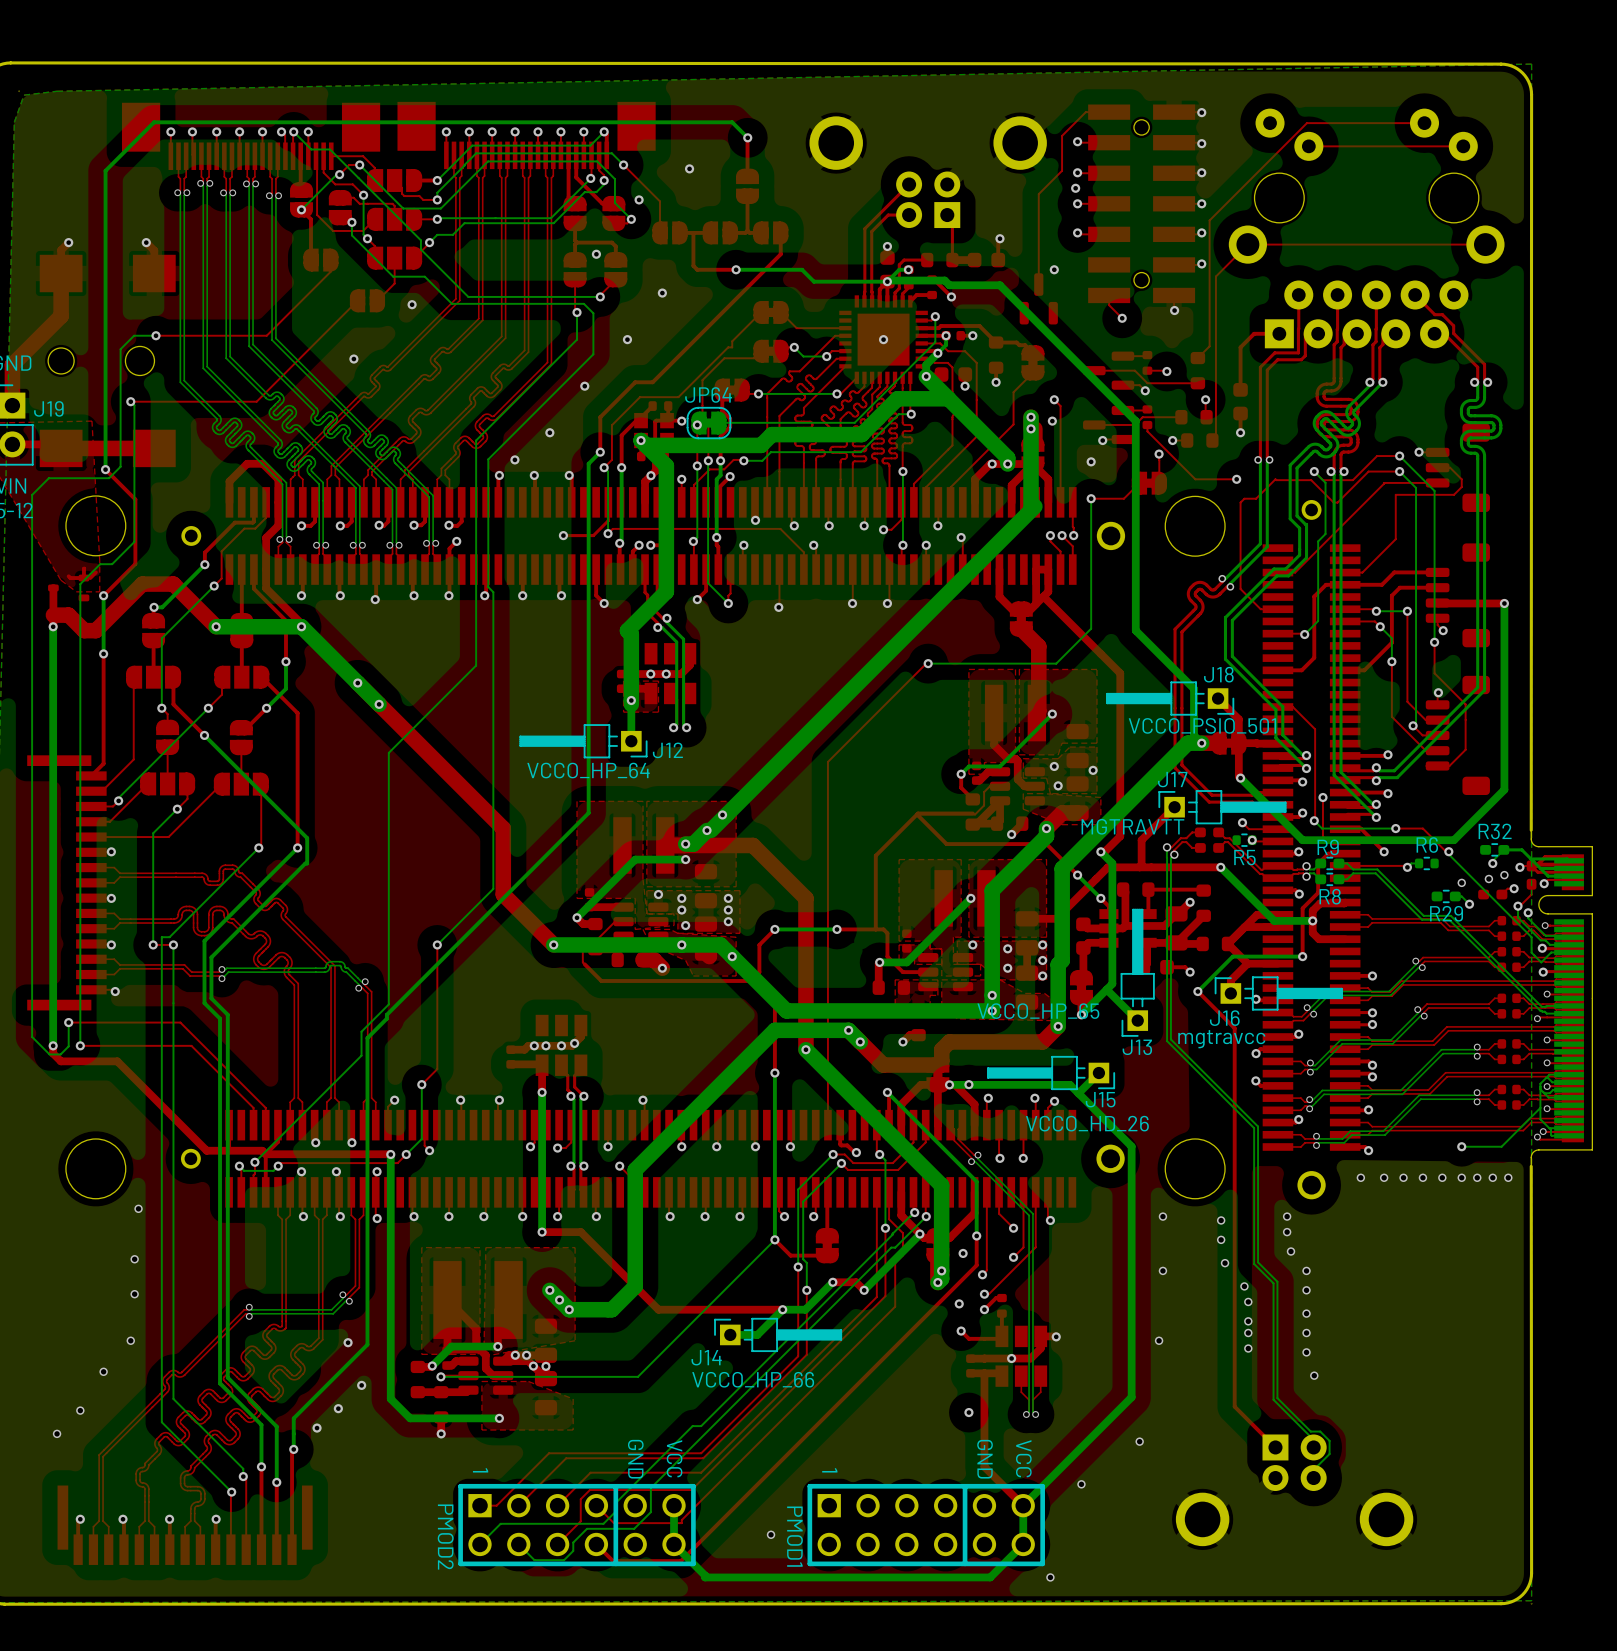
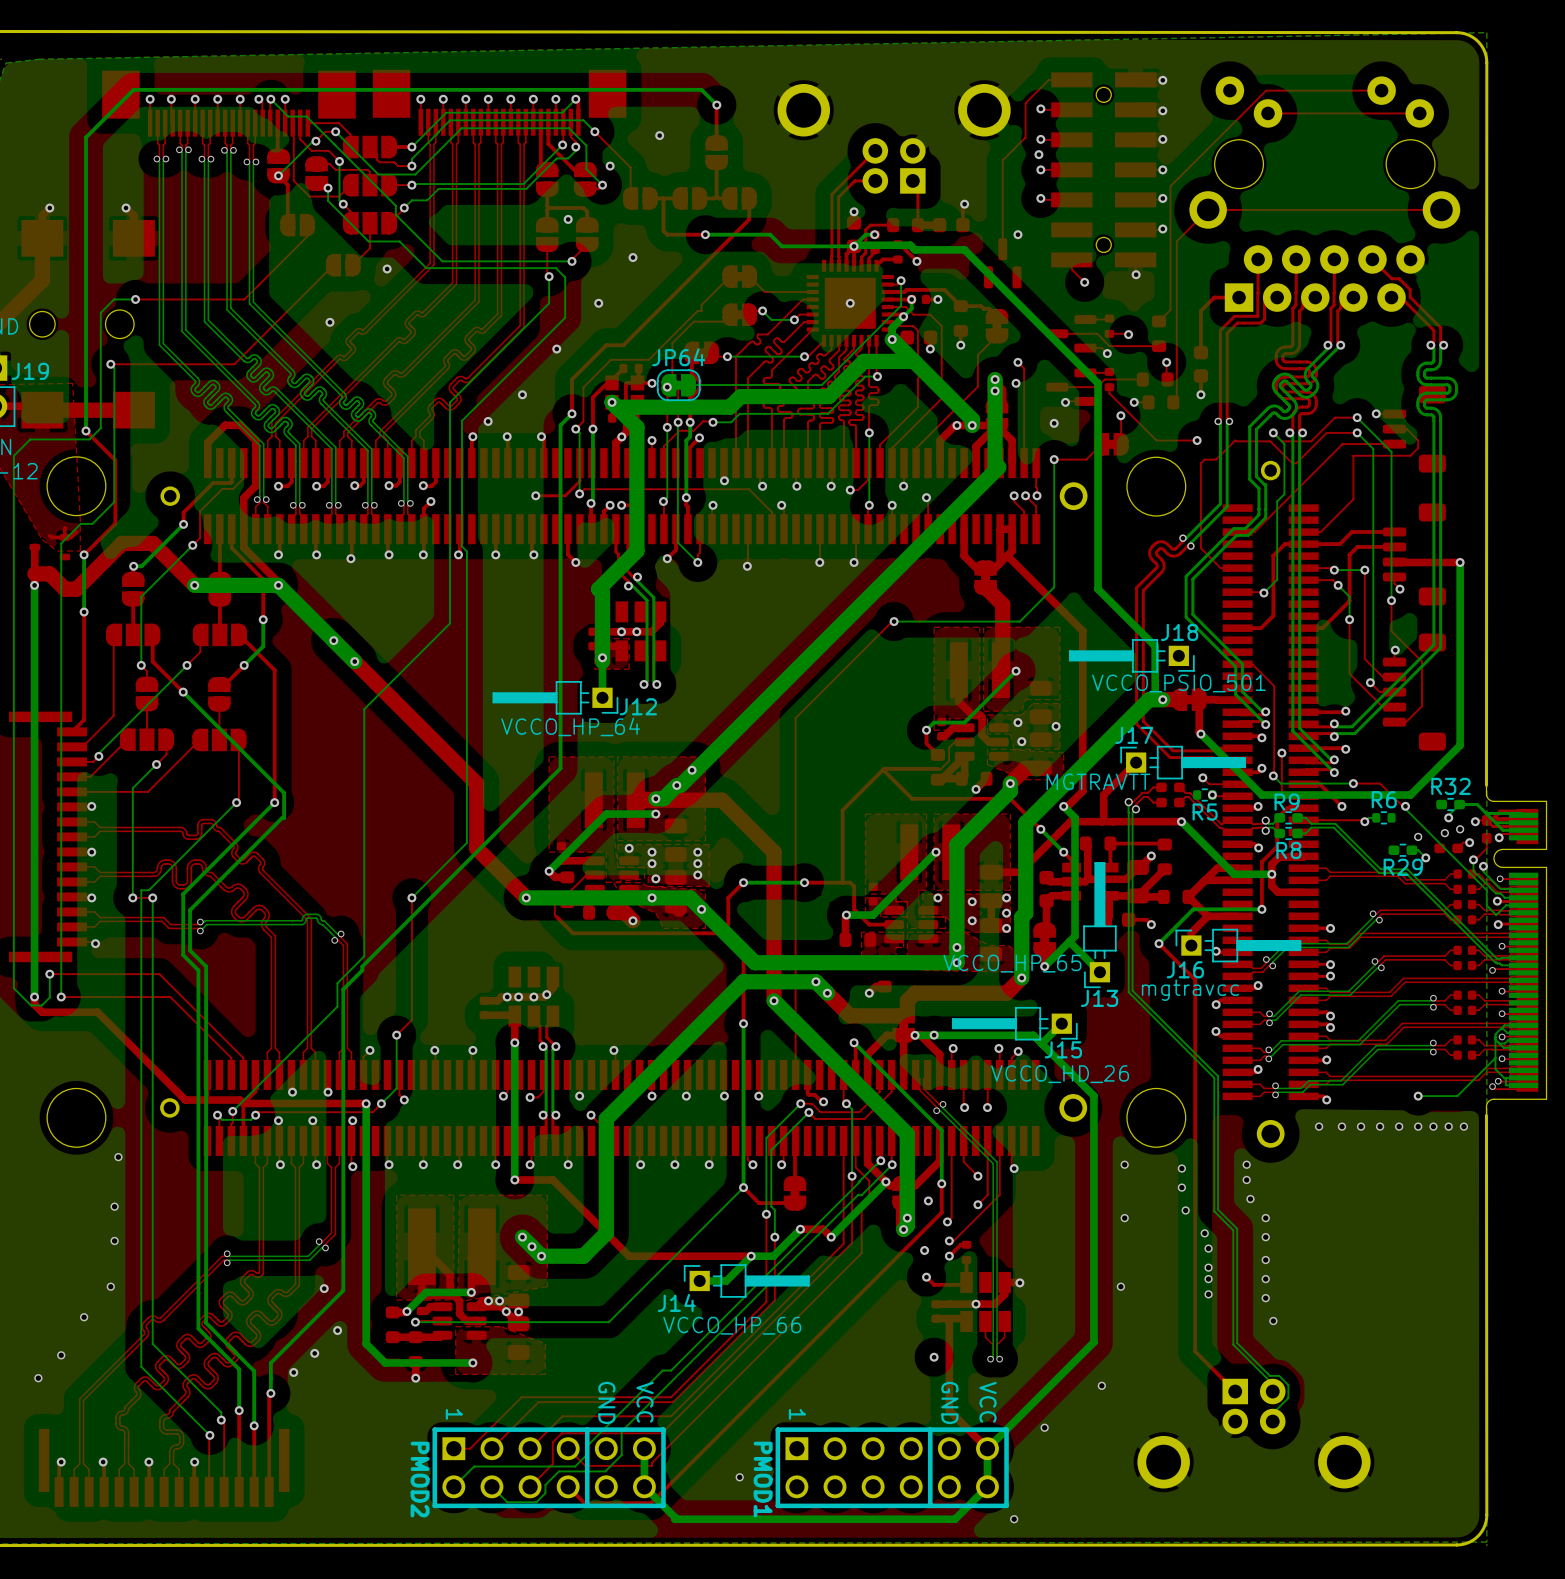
top track: (1218, 698) (1238, 719) (1238, 743) -> none

